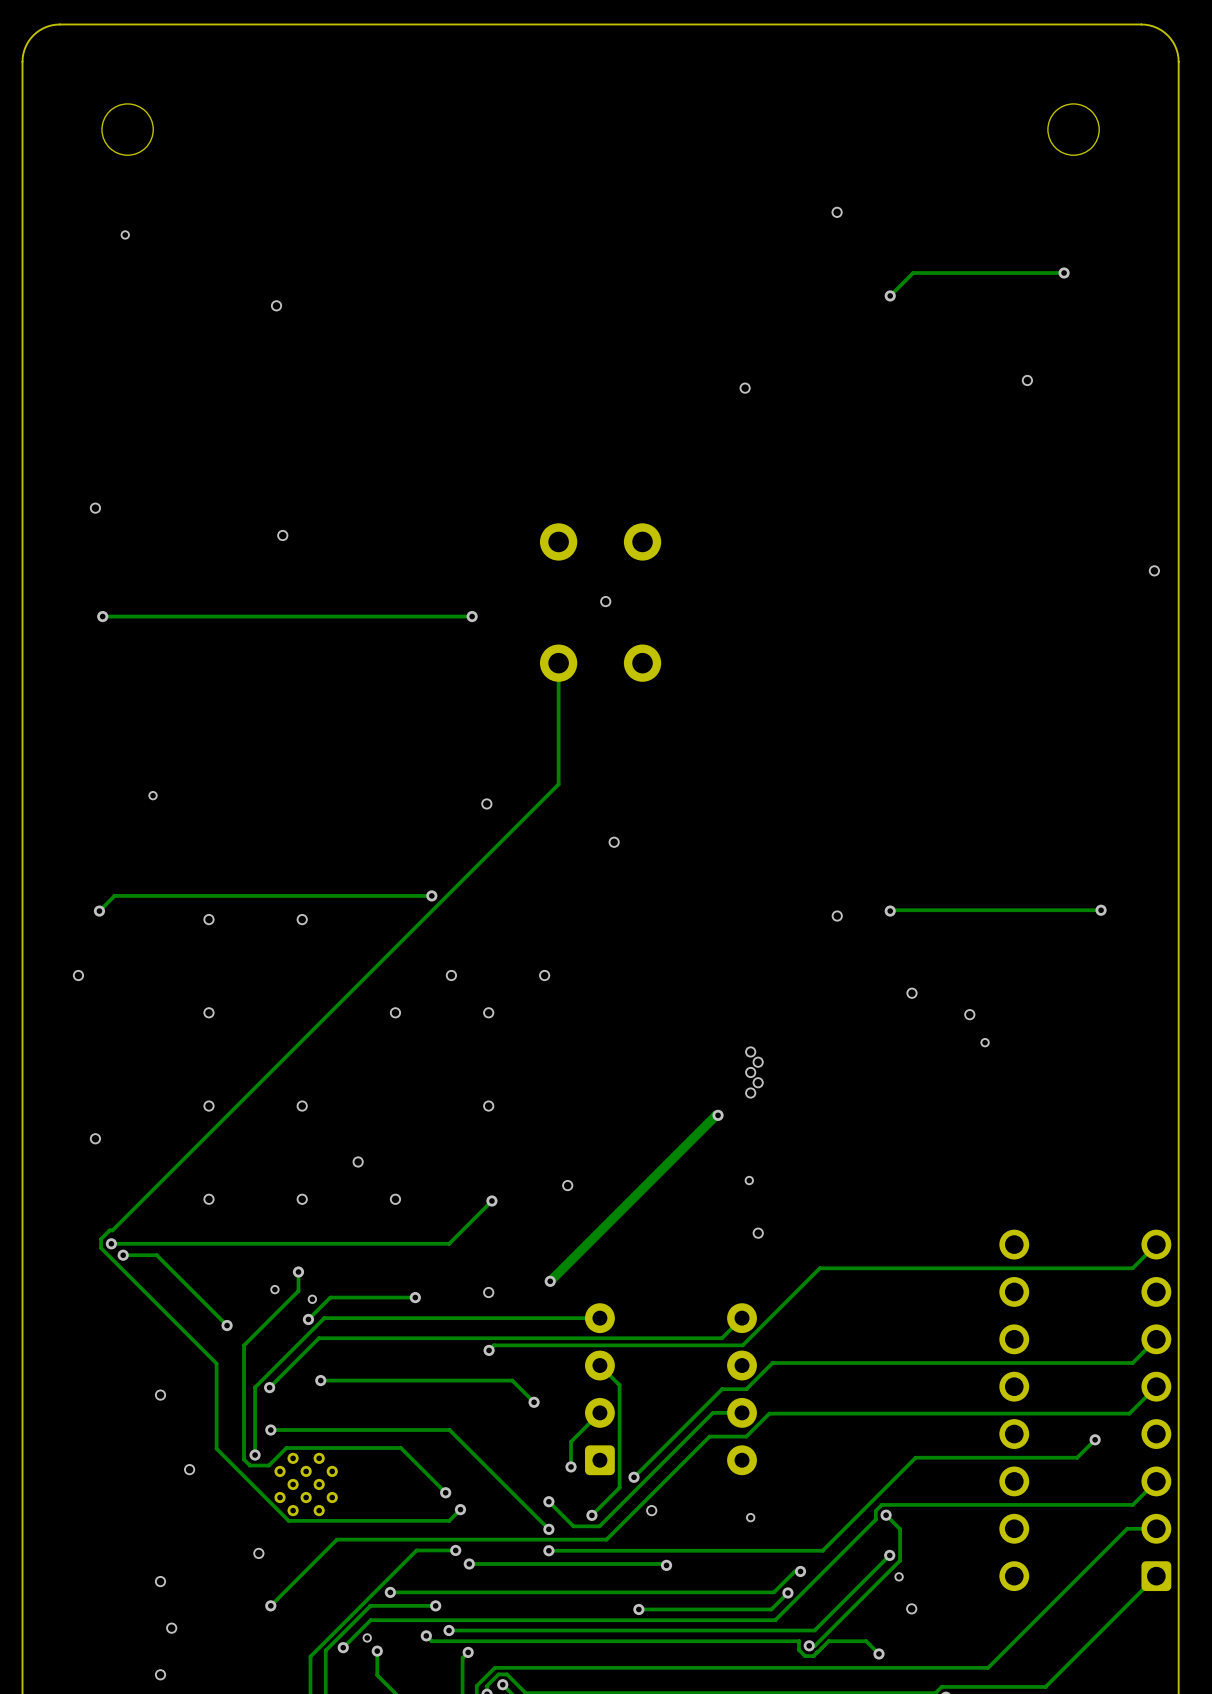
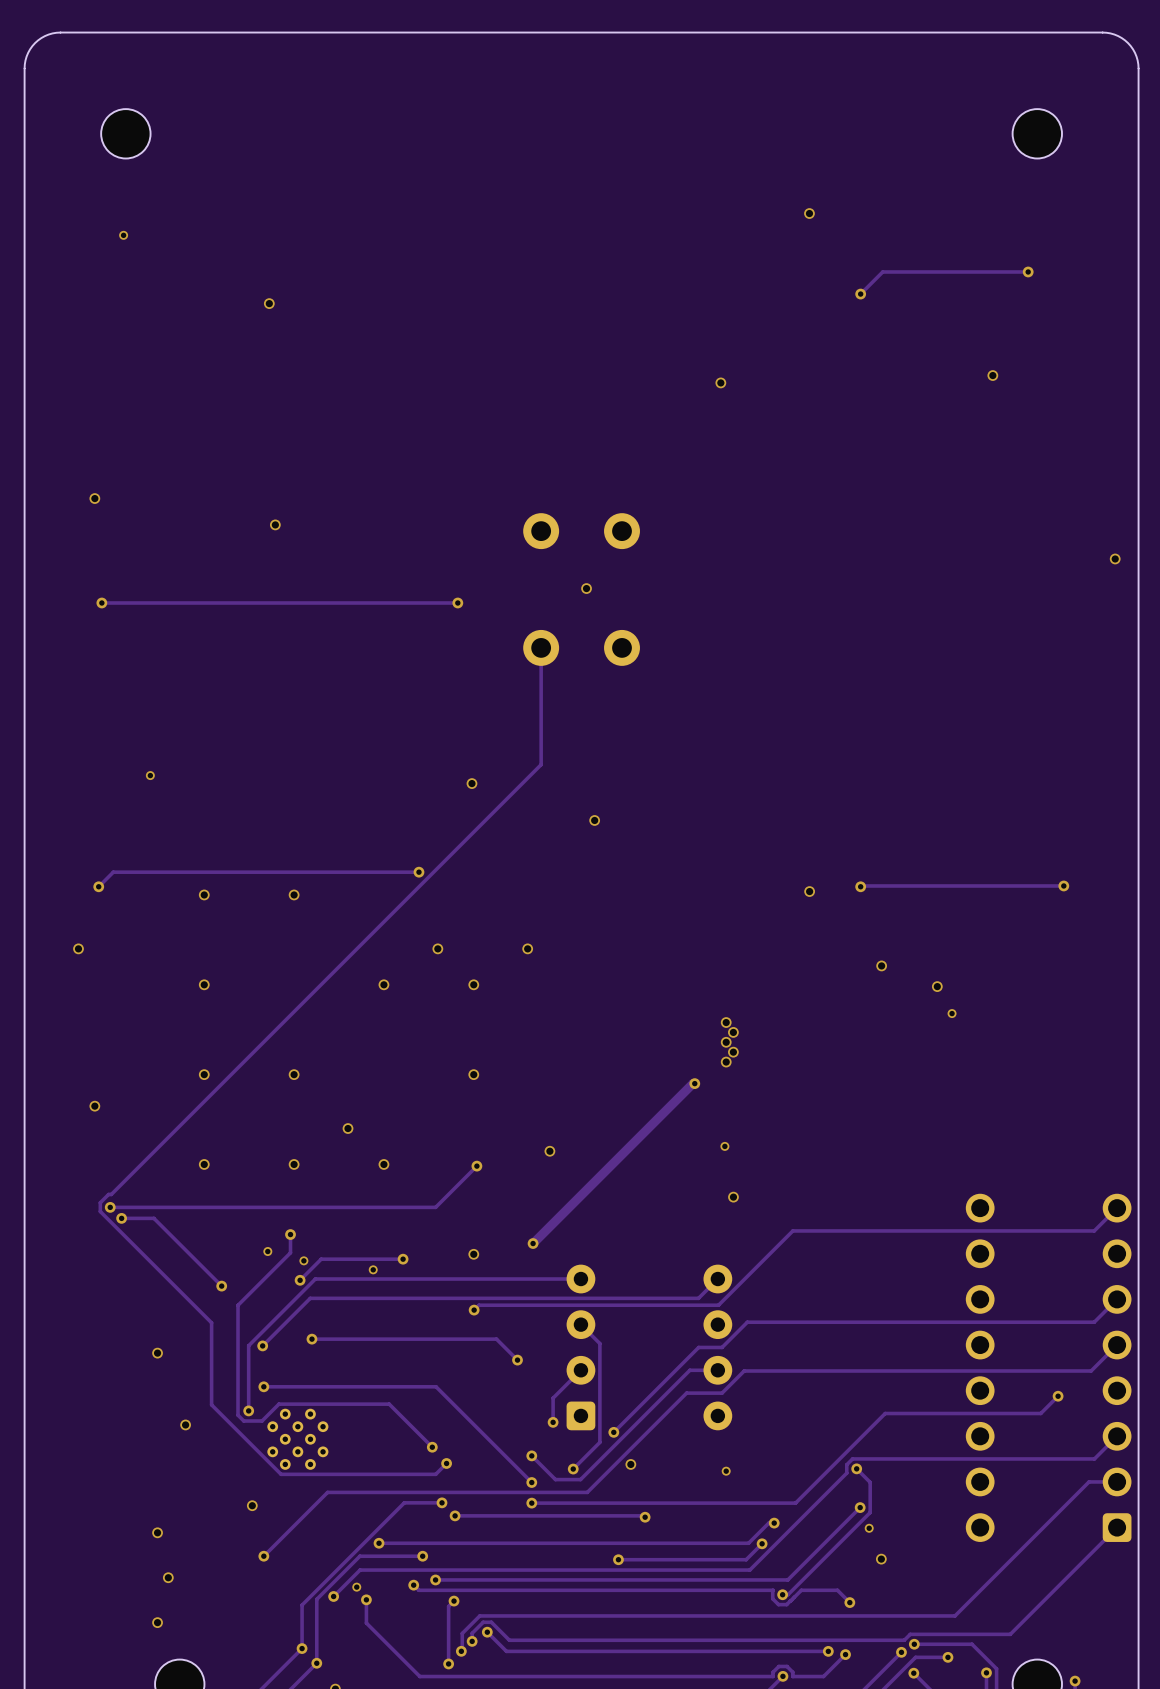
via: none -> (373, 1269)

